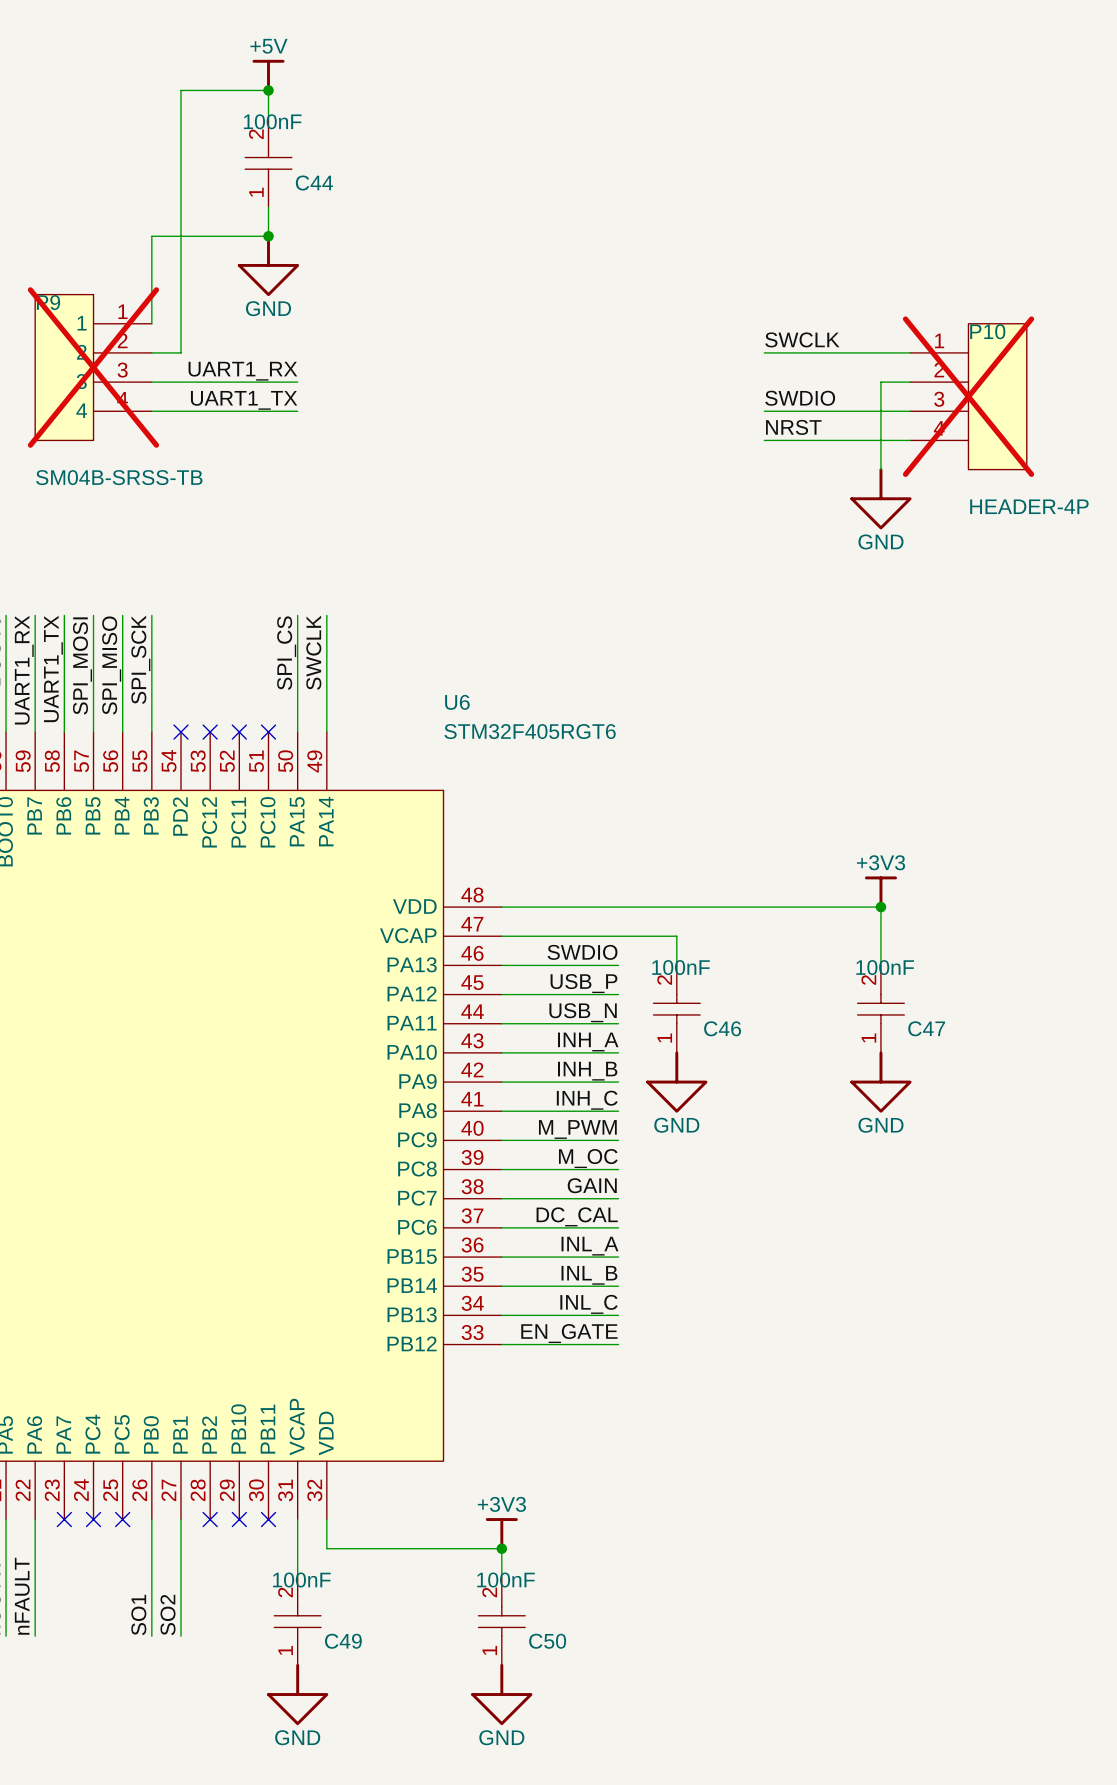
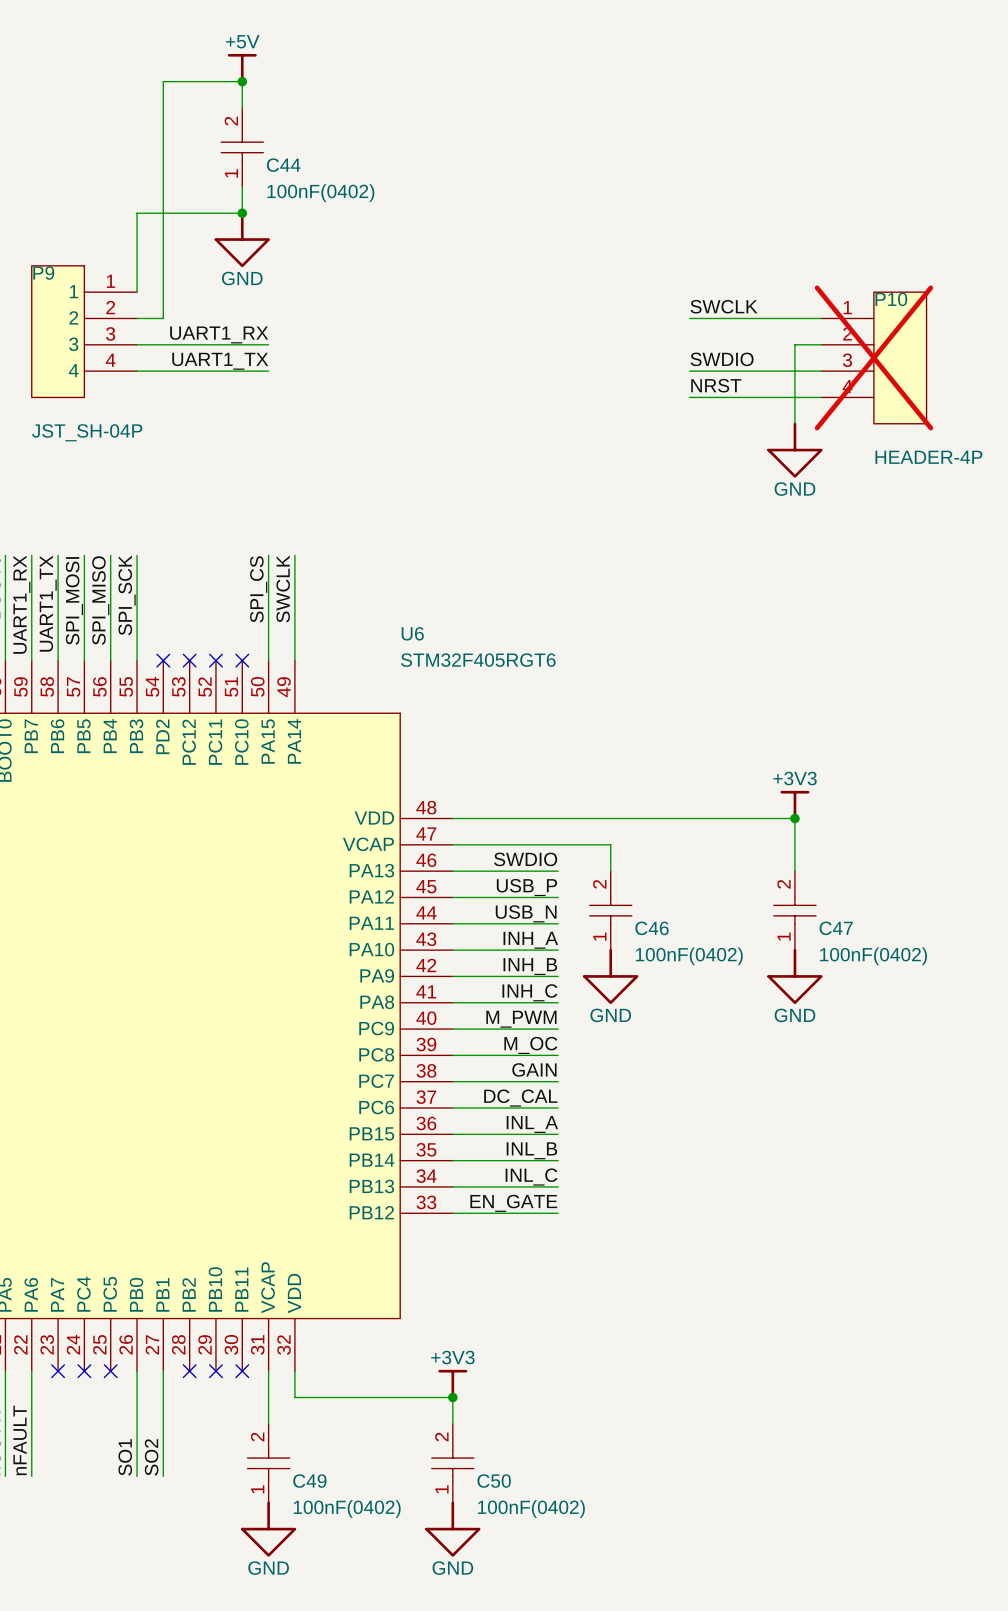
C44 value: 100nF (272, 121) -> none
C44 text: none -> 100nF(0402) (320, 193)
P9 do-not-place cross: (93, 367) -> none
P9 value: SM04B-SRSS-TB (119, 477) -> JST_SH-04P (87, 432)
C46 value: 100nF (680, 967) -> none
C47 value: 100nF (885, 967) -> none
C46 text: none -> 100nF(0402) (689, 956)
C47 text: none -> 100nF(0402) (873, 956)
C49 value: 100nF (301, 1580) -> none
C50 value: 100nF (506, 1580) -> none
C49 text: none -> 100nF(0402) (347, 1508)
C50 text: none -> 100nF(0402) (531, 1508)

